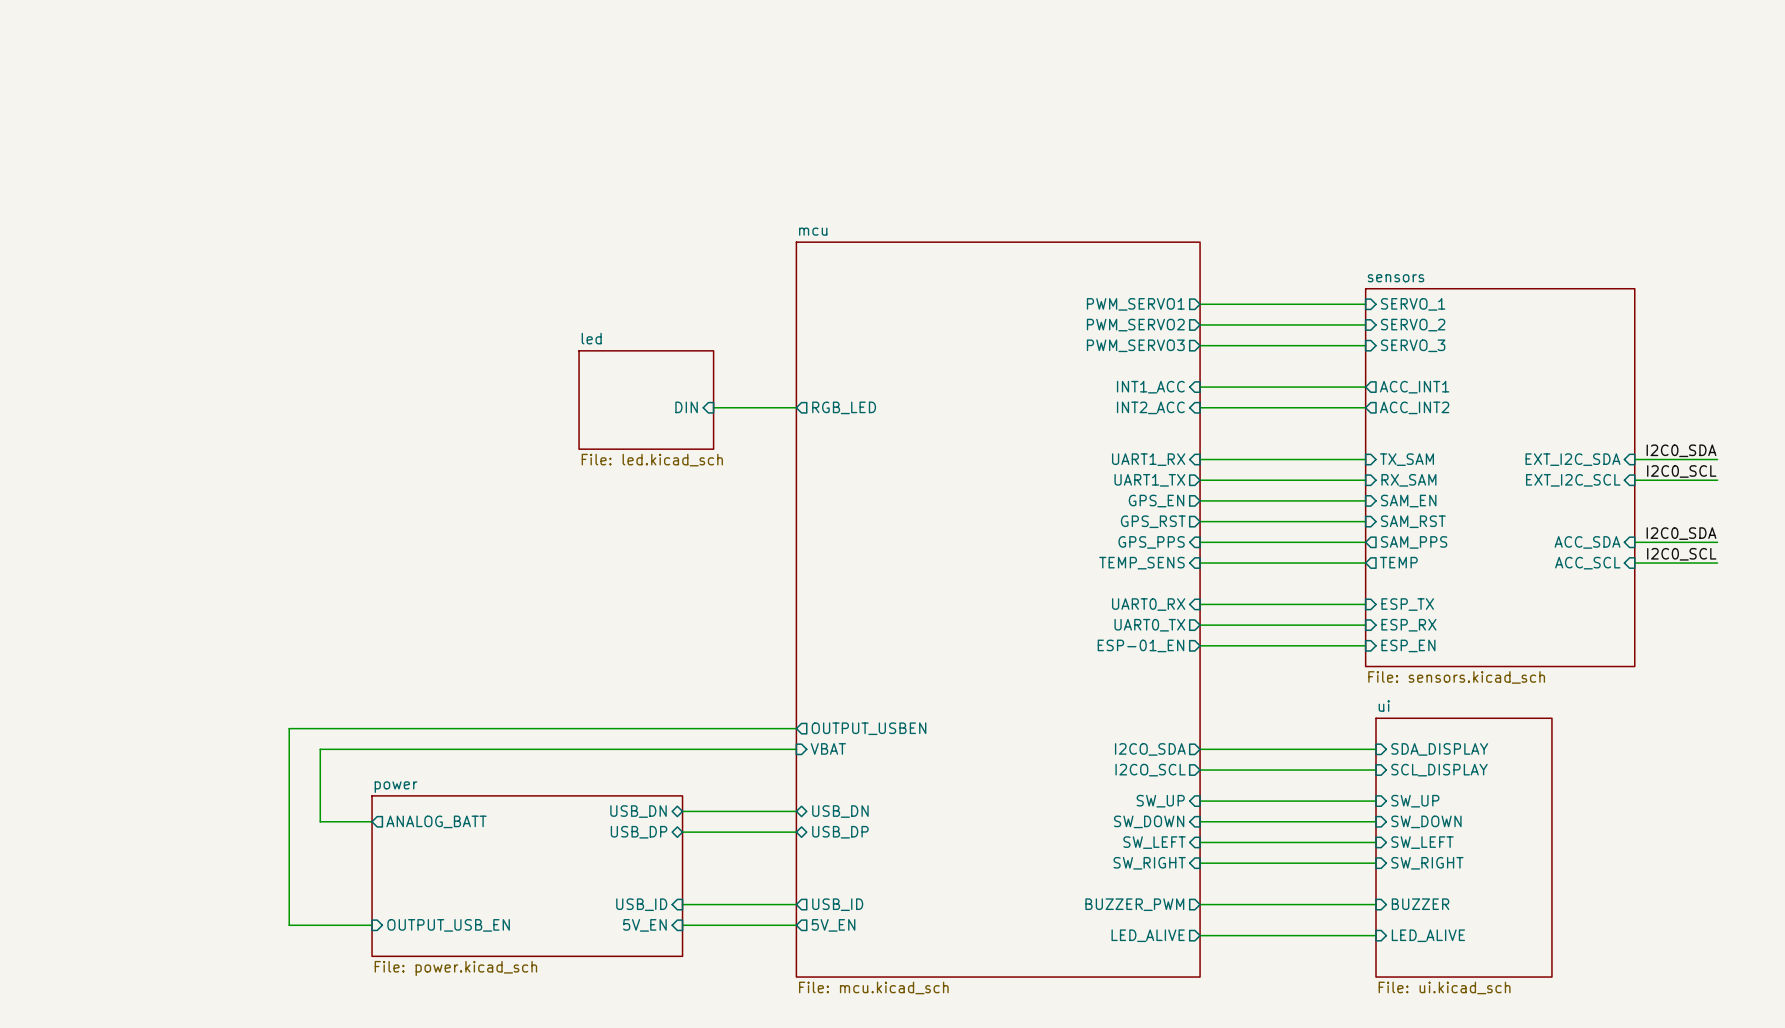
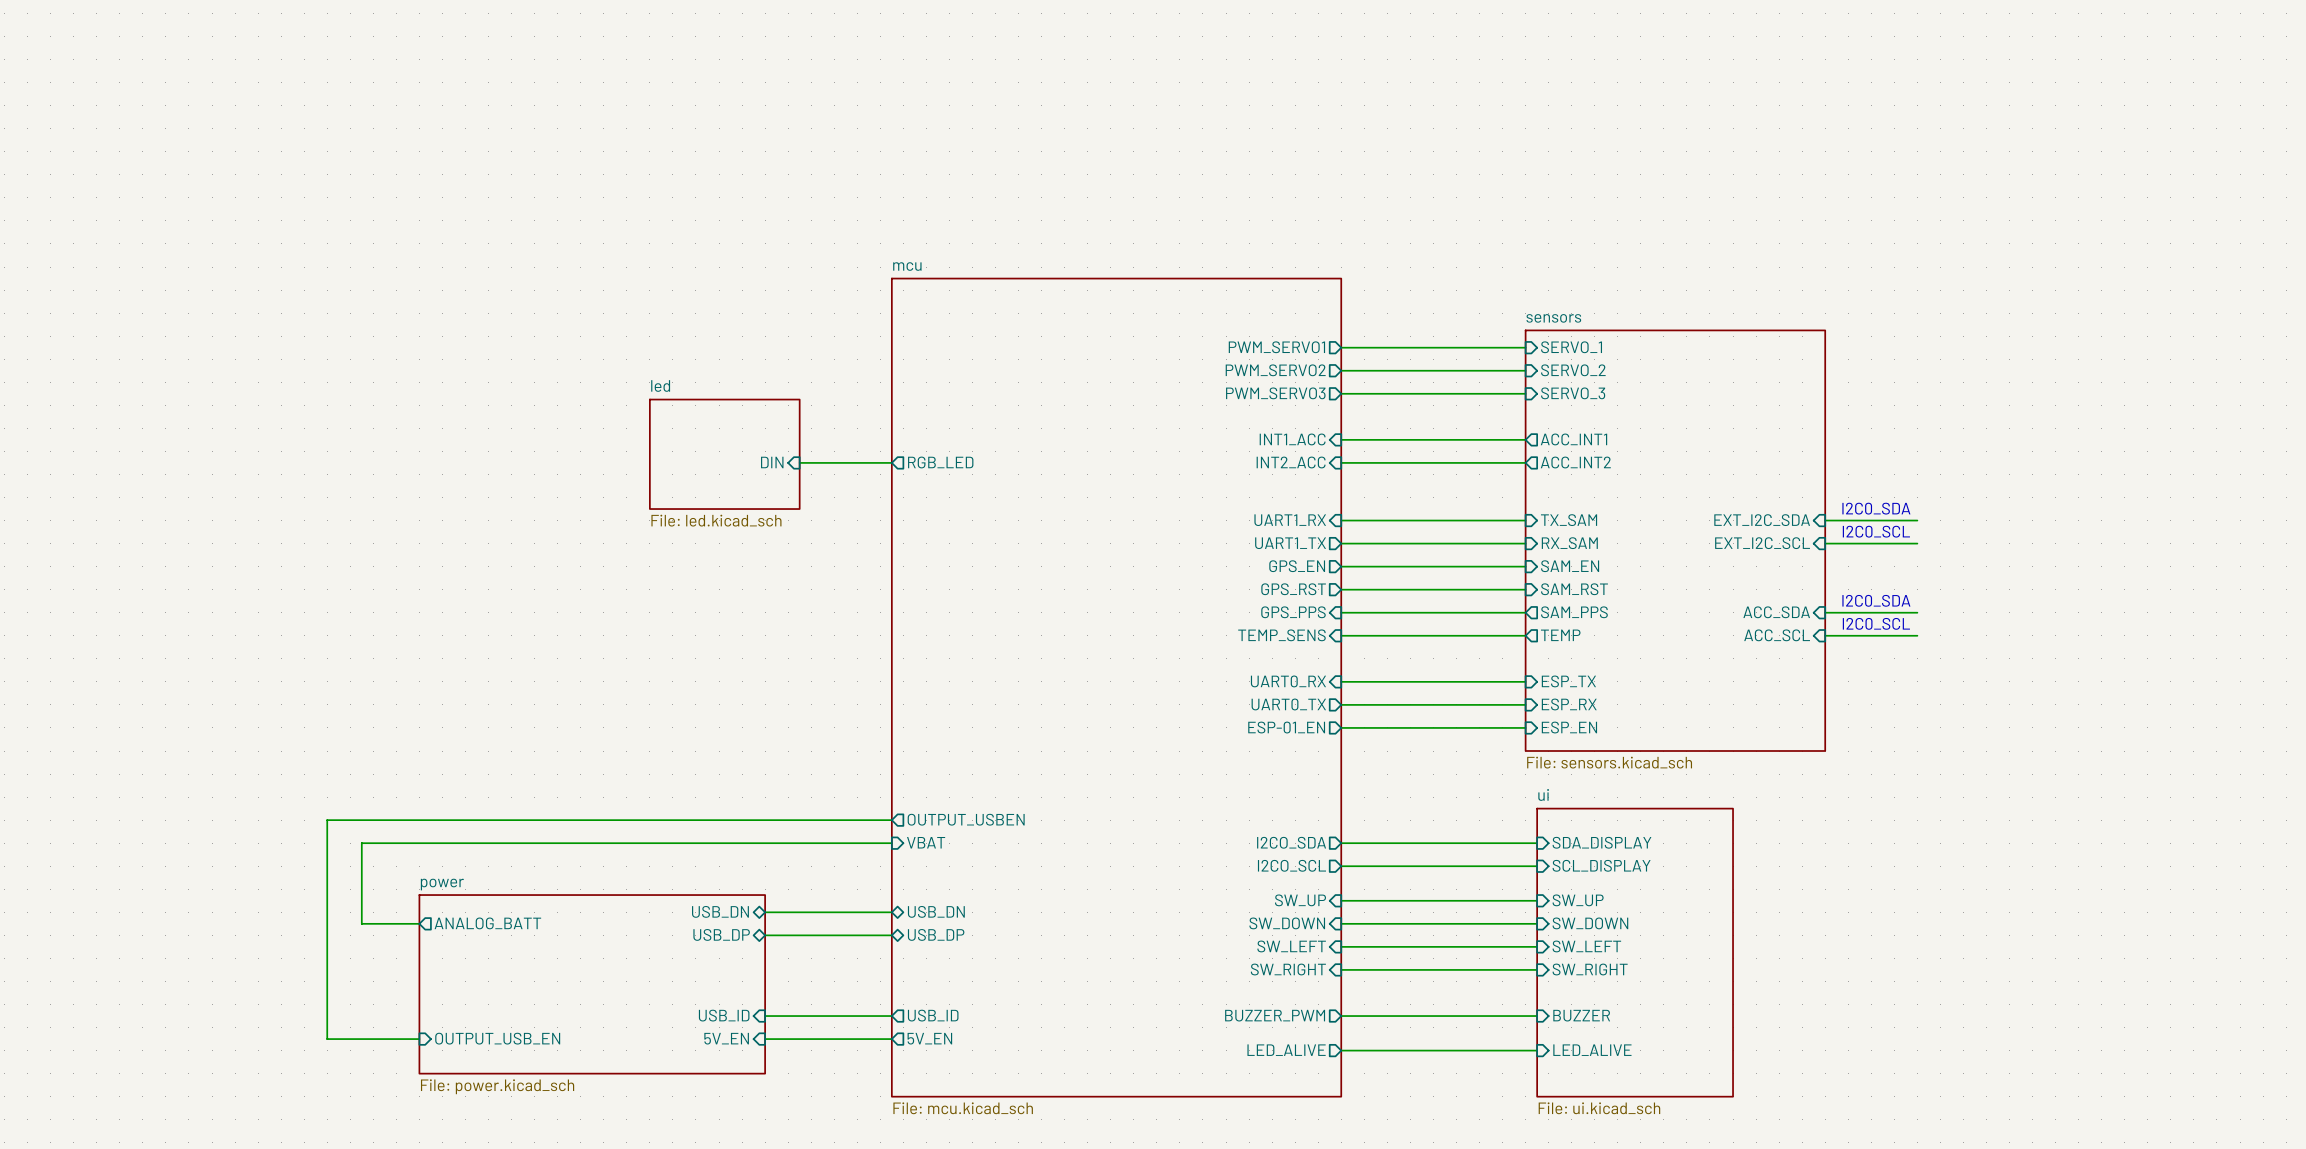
text: none -> I2C0_SDA (1876, 508)
label: I2C0_SDA (1681, 450) -> none
text: none -> I2C0_SCL (1876, 531)
label: I2C0_SCL (1681, 471) -> none
text: none -> I2C0_SDA (1876, 600)
label: I2C0_SDA (1681, 533) -> none
text: none -> I2C0_SCL (1876, 623)
label: I2C0_SCL (1681, 554) -> none

